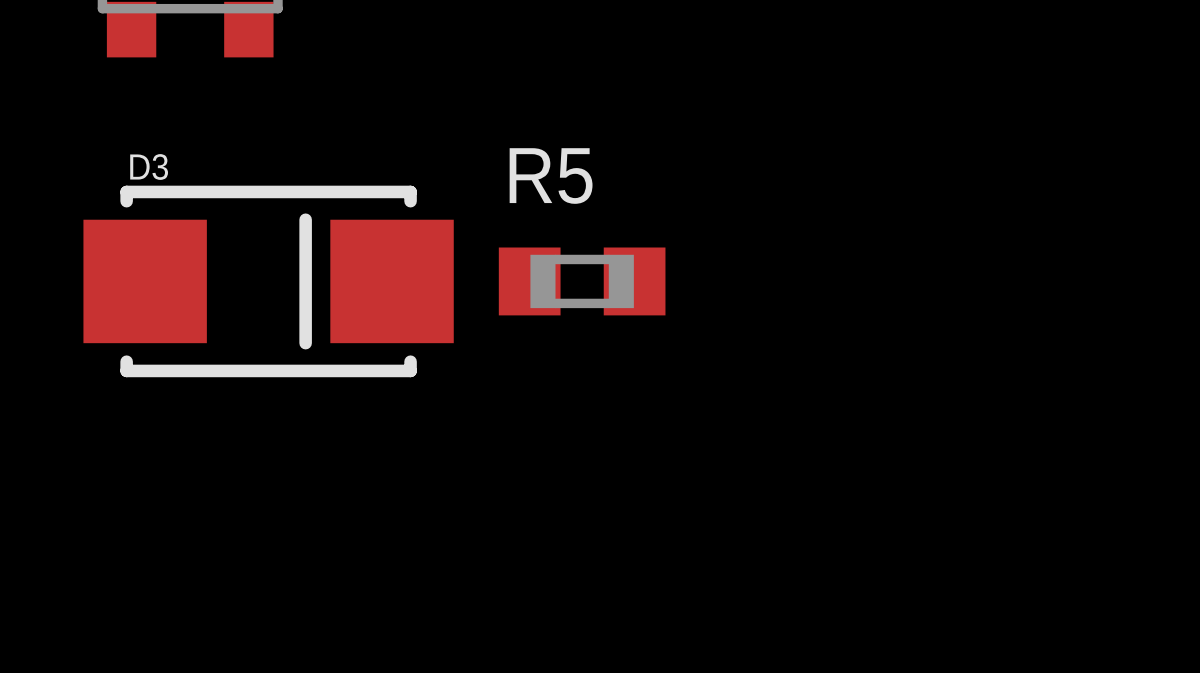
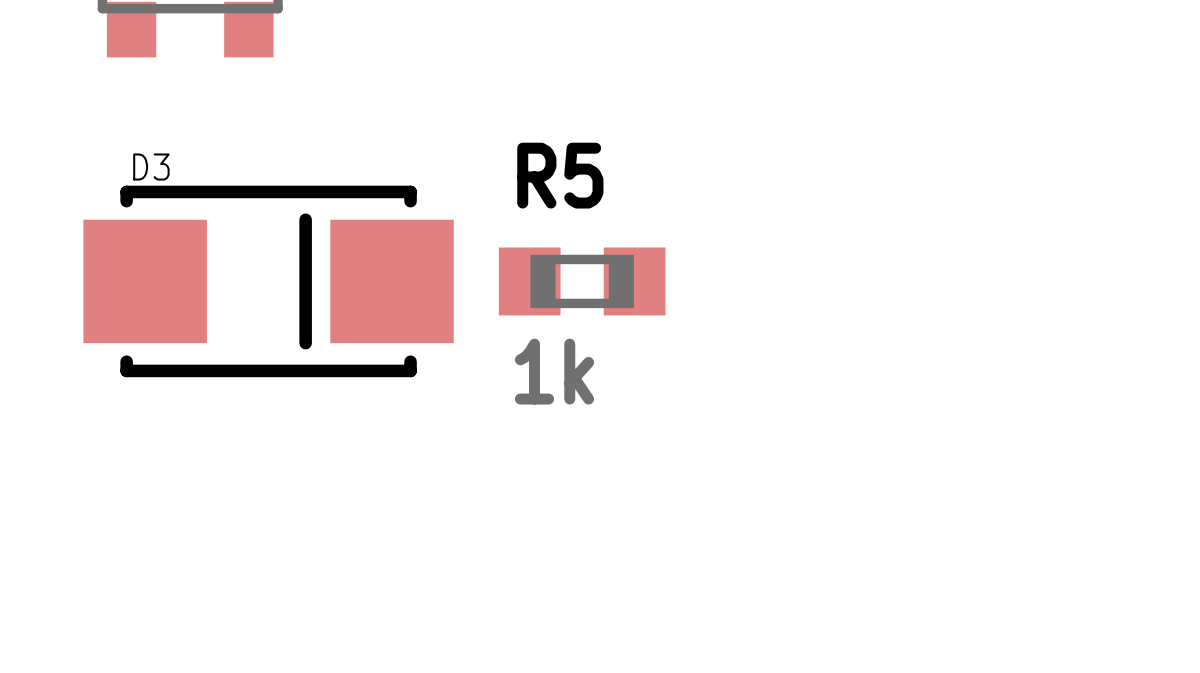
R5 value: none -> 1k (554, 371)

